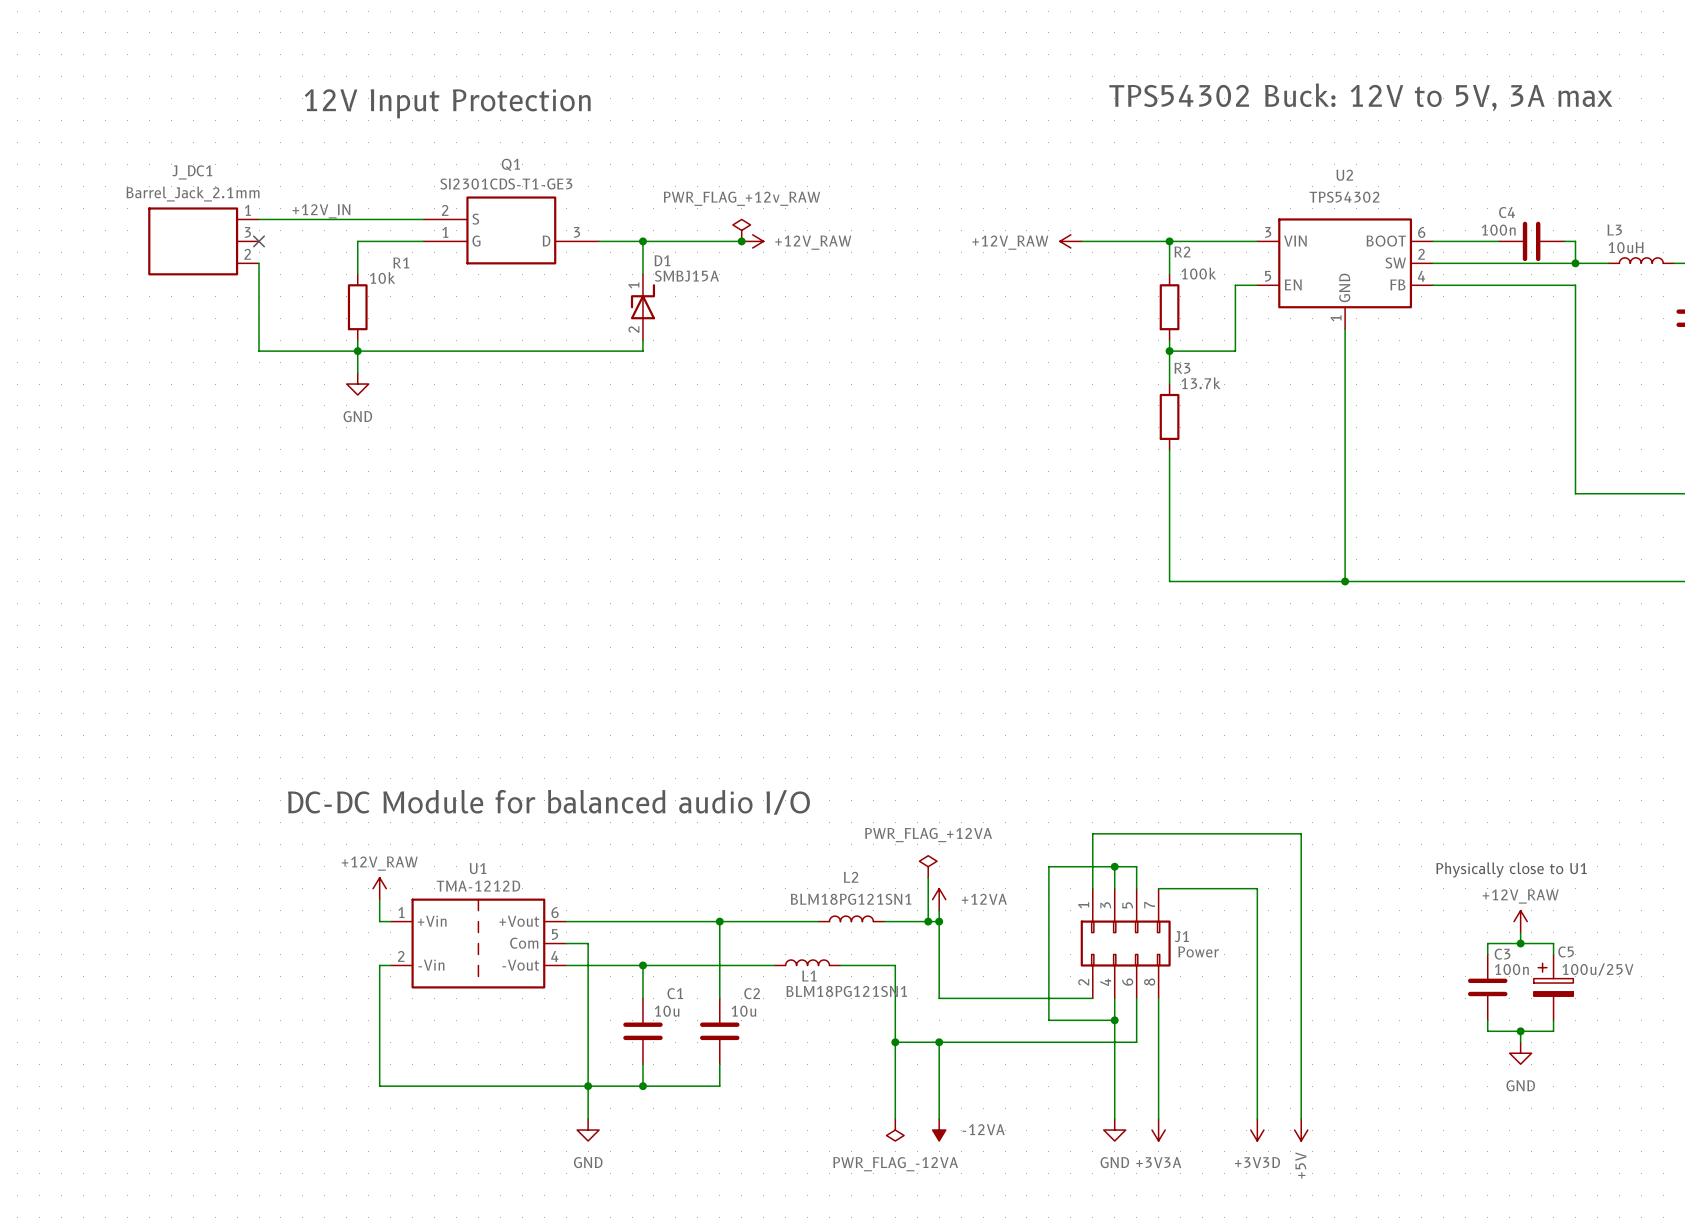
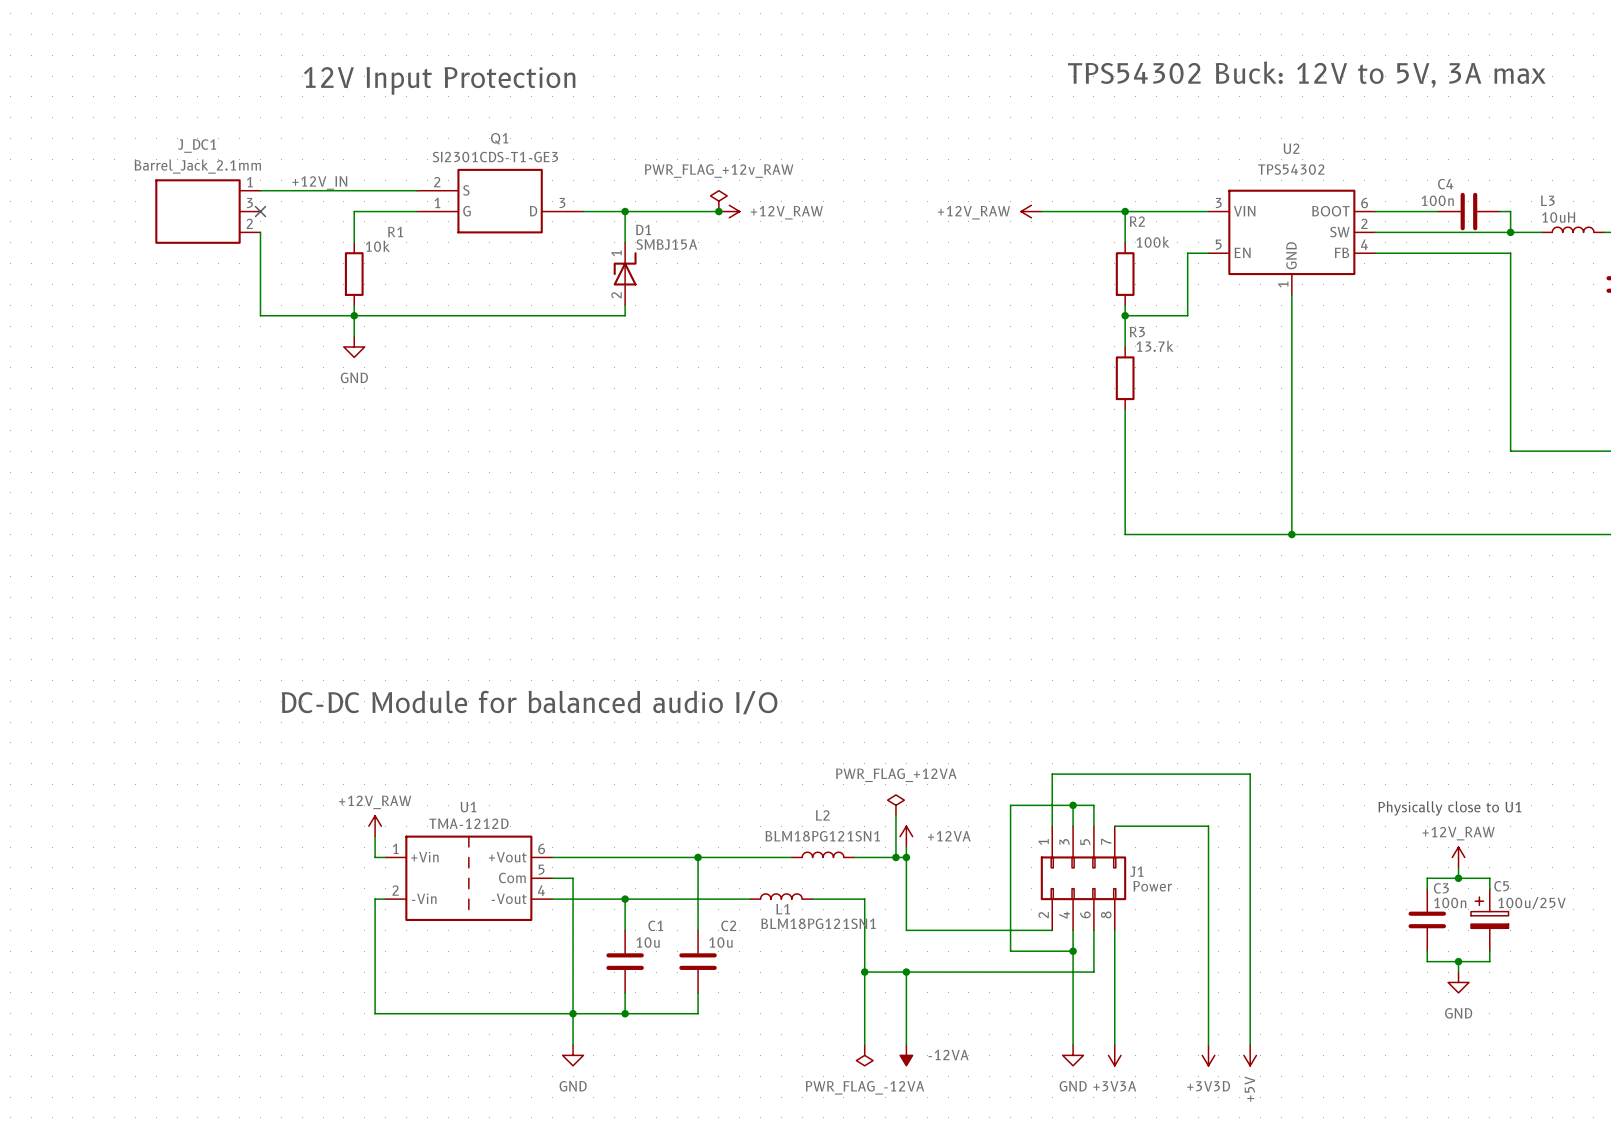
text position: DC-DC Module for balanced audio I/O (548, 802) -> DC-DC Module for balanced audio I/O (529, 702)

